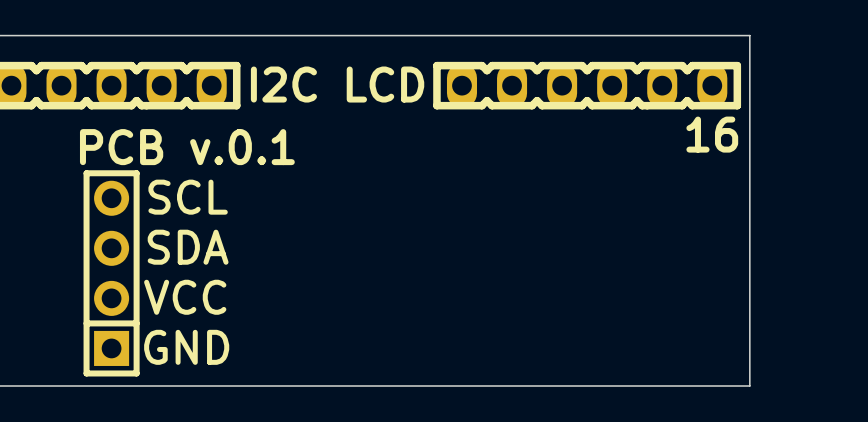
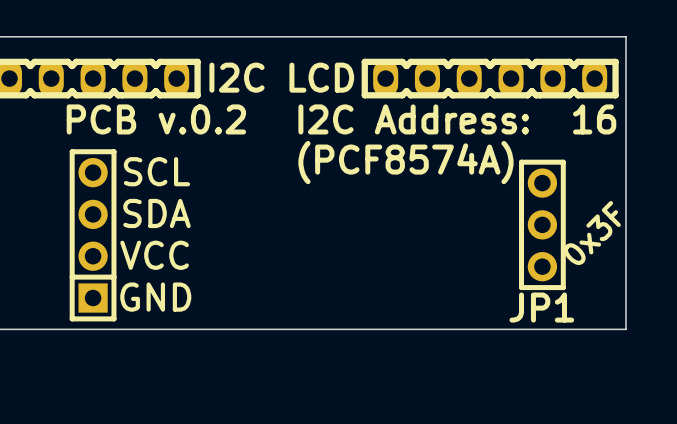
text: none -> I2C Address: (413, 119)
text: PCB v.0.1 (187, 147) -> PCB v.0.2 (156, 119)
text: none -> (PCF8574A) (405, 162)
JP1: none -> (542, 224)
text: none -> 0x3F (592, 233)

